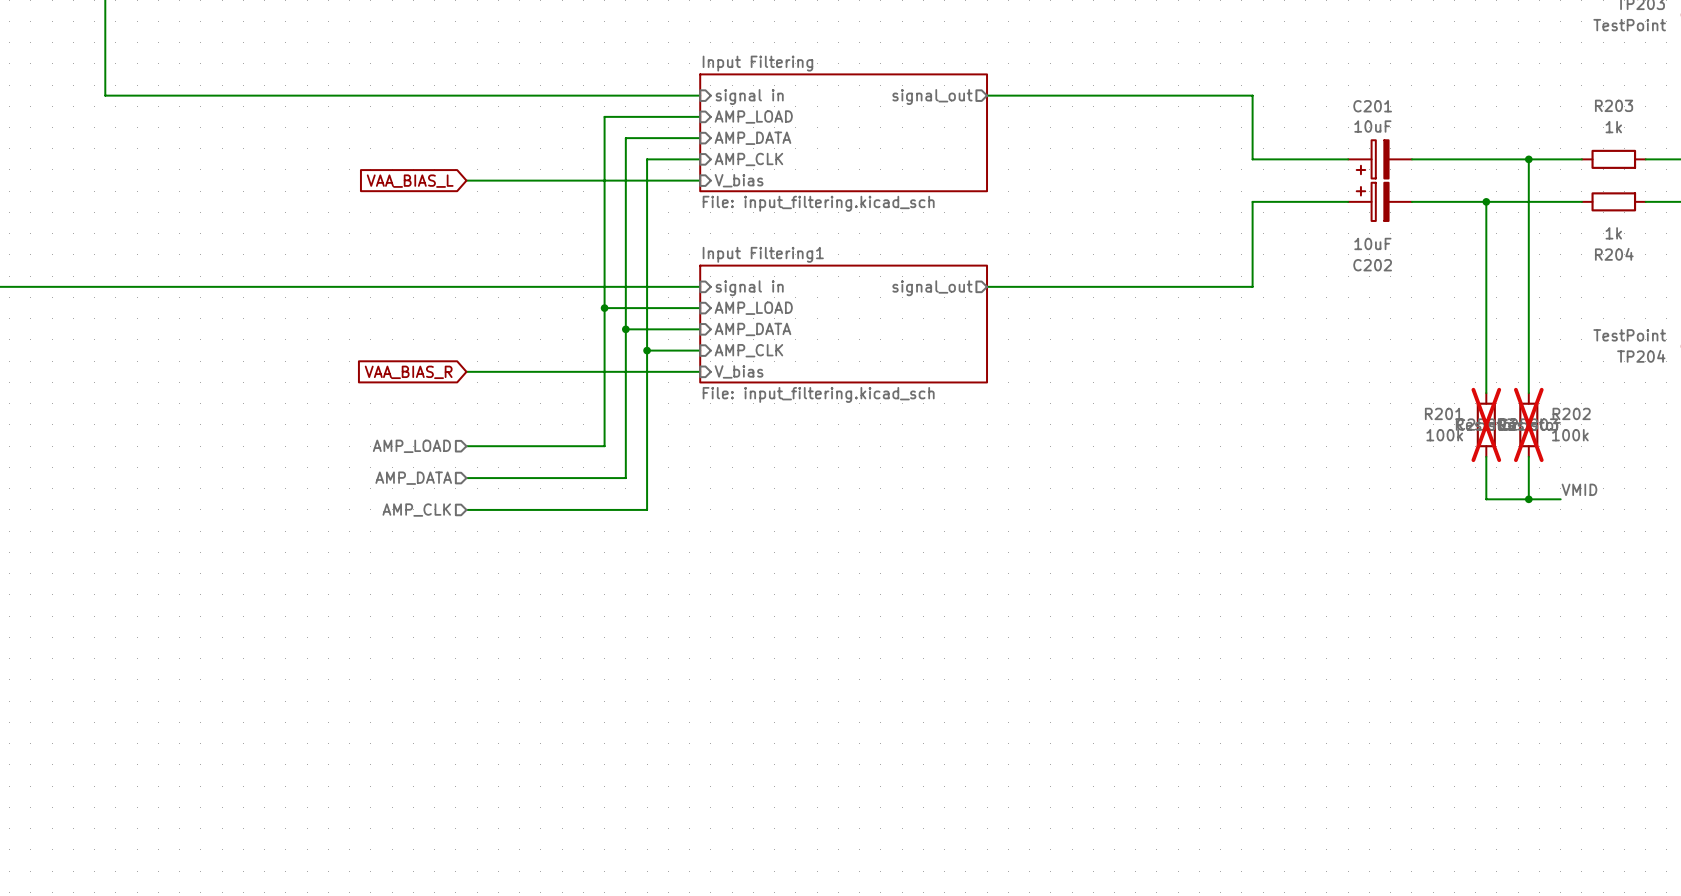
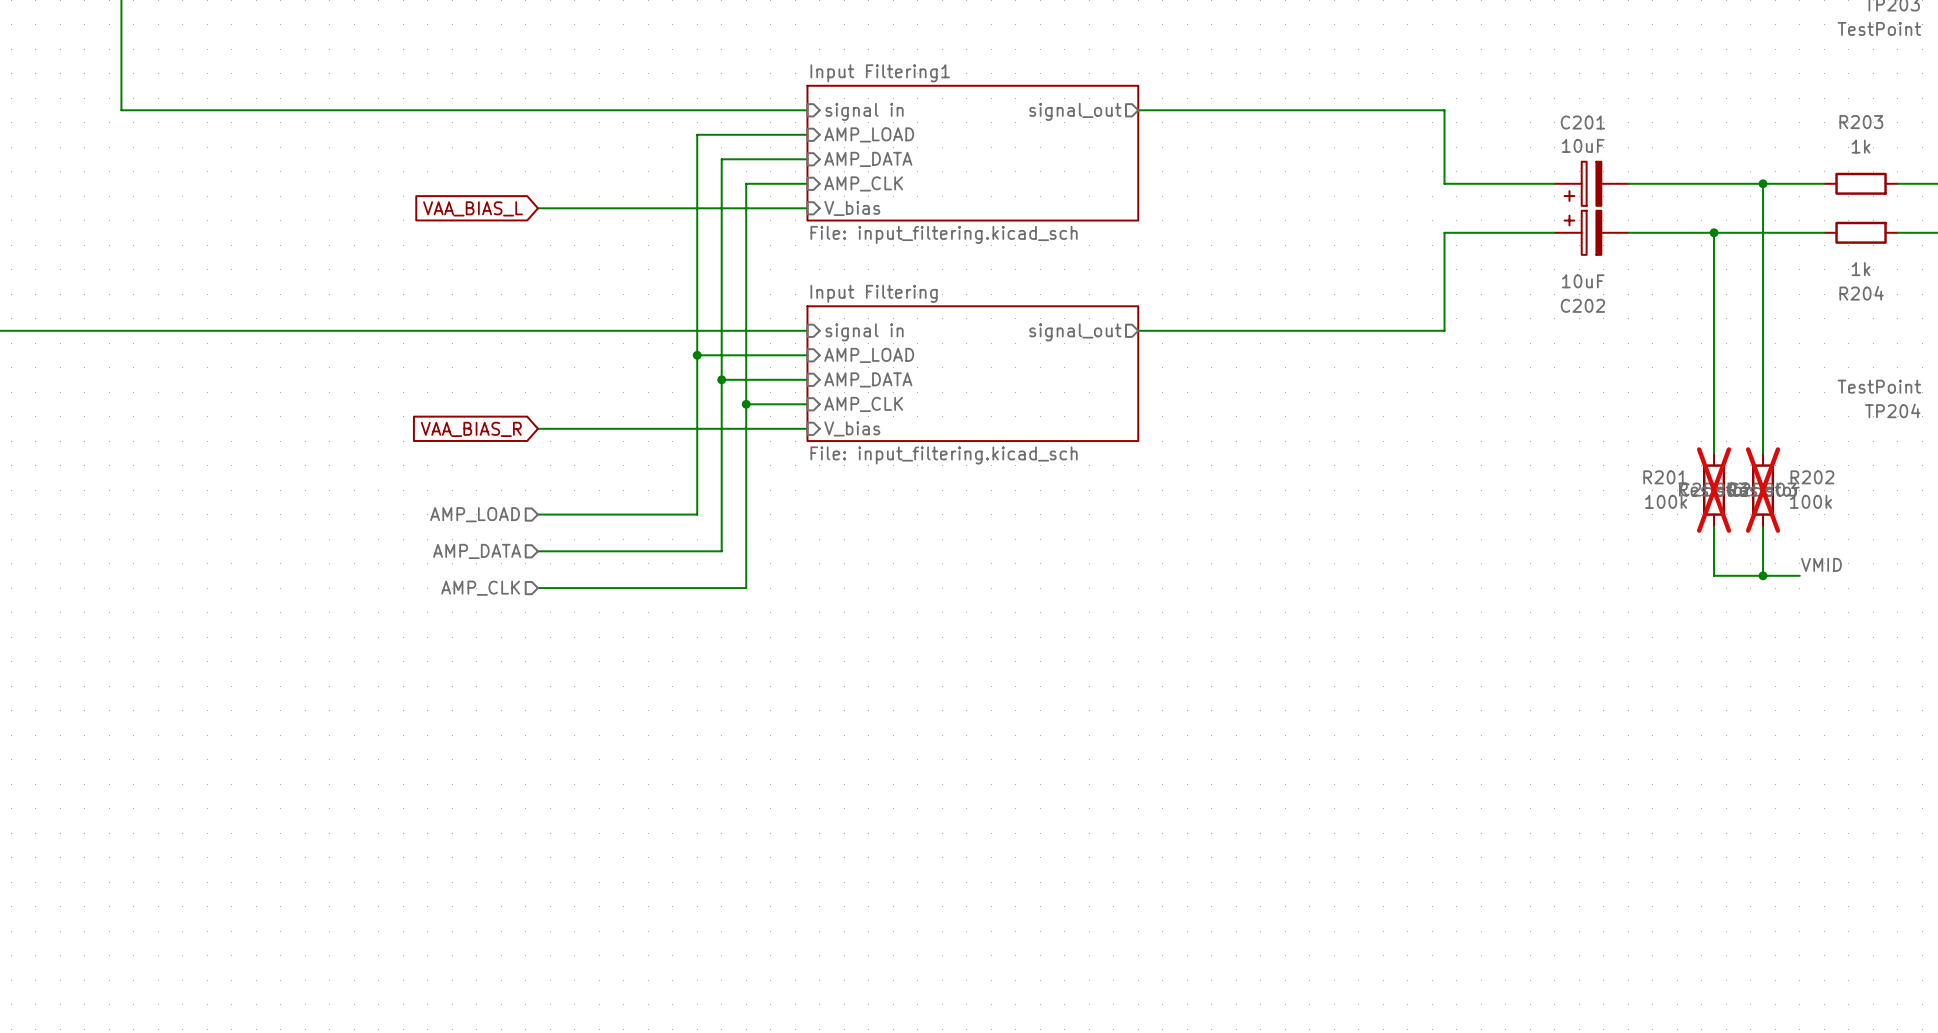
sheet Input Filtering name: Input Filtering (757, 63) -> Input Filtering1 (880, 73)
sheet Input Filtering1 name: Input Filtering1 (763, 254) -> Input Filtering (874, 293)

